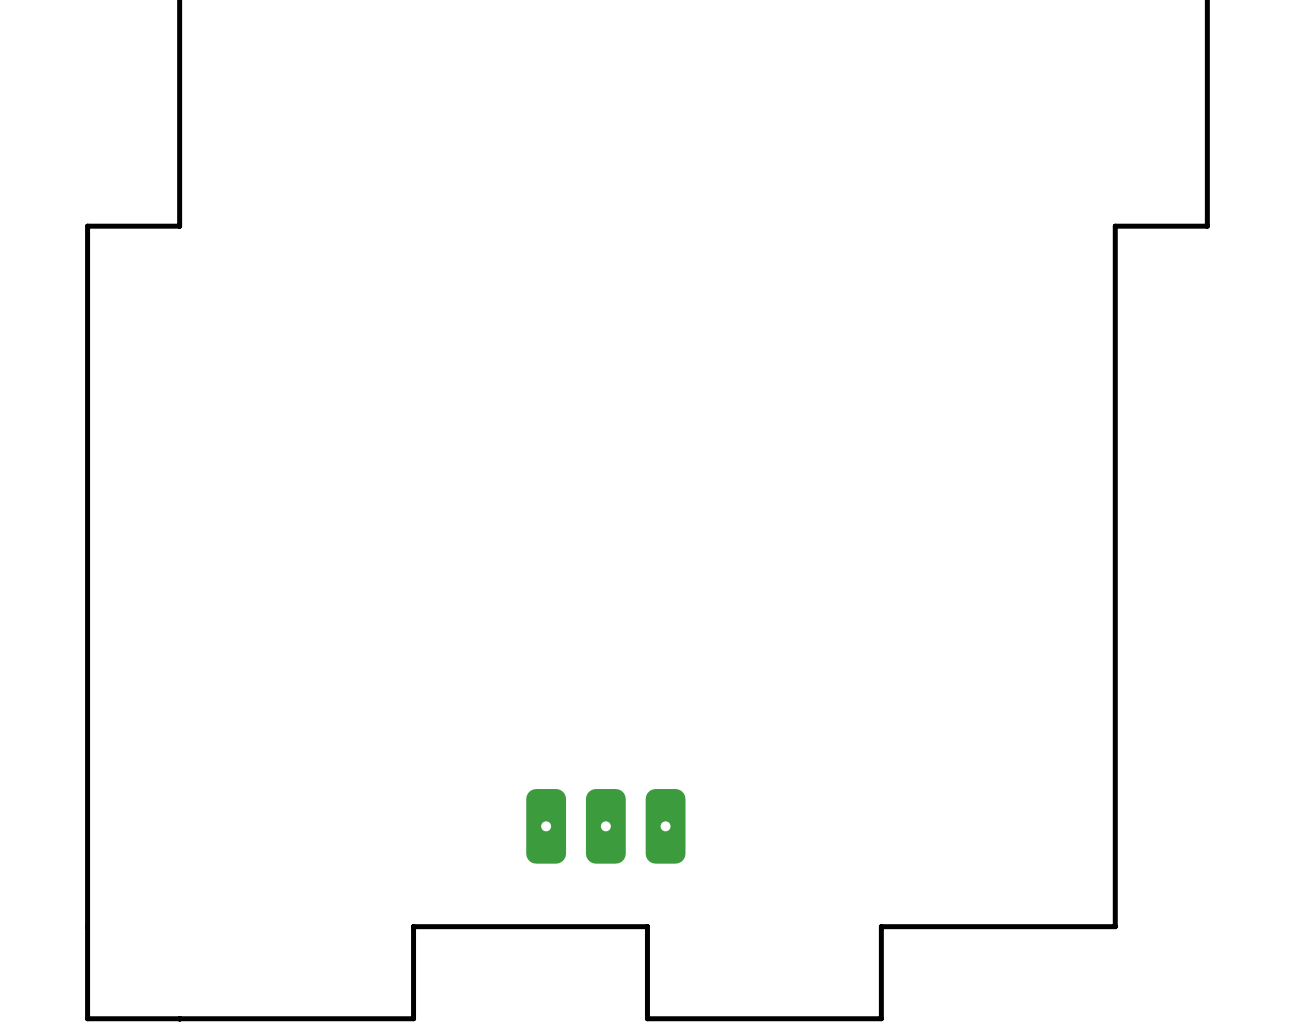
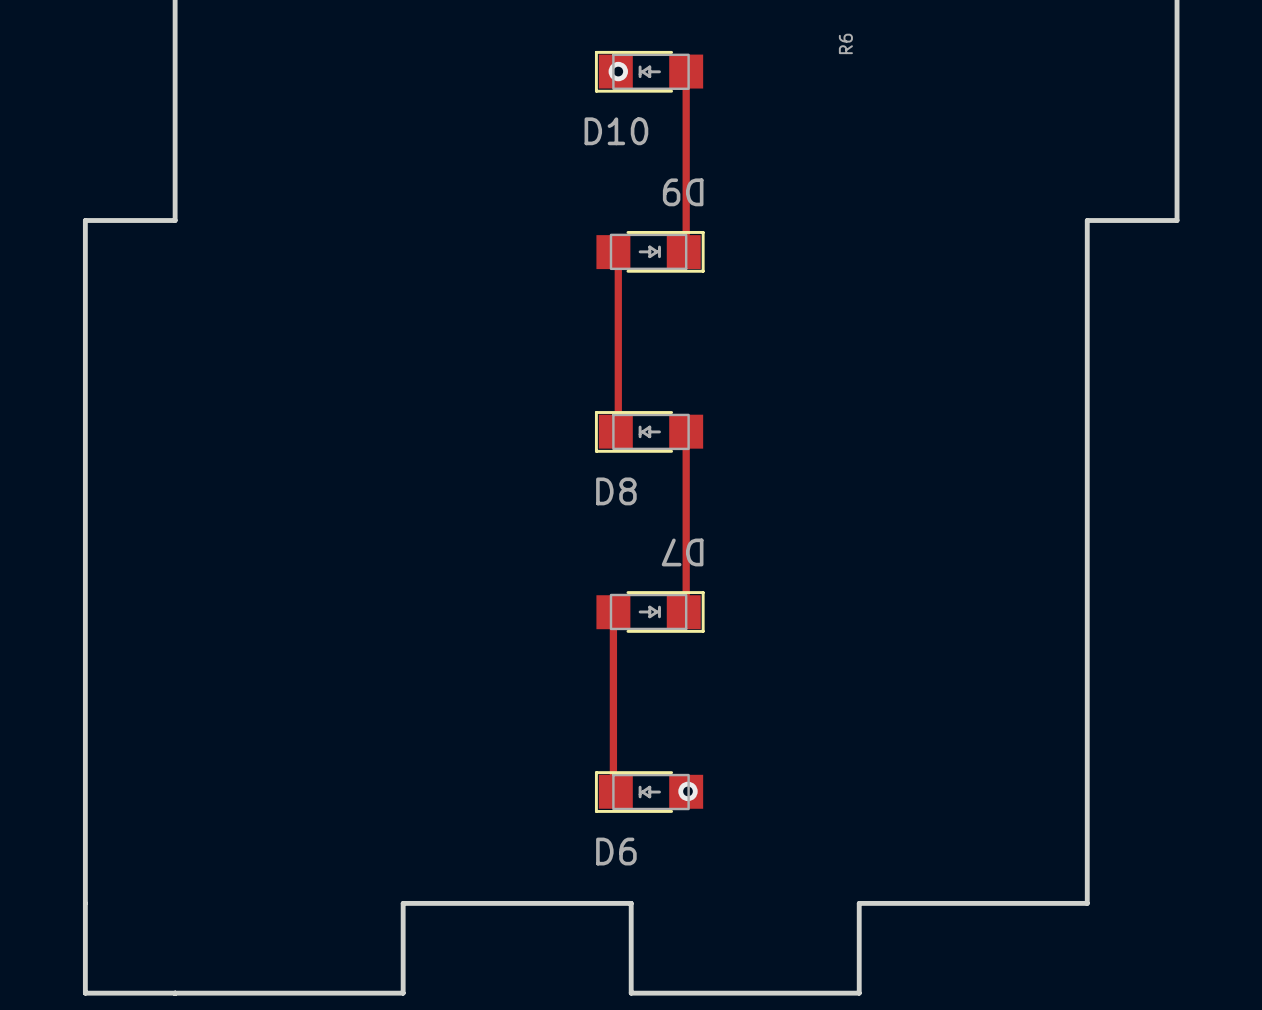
R6: none -> (845, 43)
via: none -> (618, 71)
D10: none -> (649, 71)
track: none -> (686, 71) (686, 249) (683, 252)
D9: none -> (650, 251)
track: none -> (615, 259) (618, 261) (618, 436)
track: none -> (686, 431) (686, 609) (683, 612)
D8: none -> (649, 431)
track: none -> (613, 612) (613, 789) (615, 791)
D7: none -> (650, 611)
via: none -> (687, 791)
D6: none -> (649, 792)
part: (605, 826) -> none

